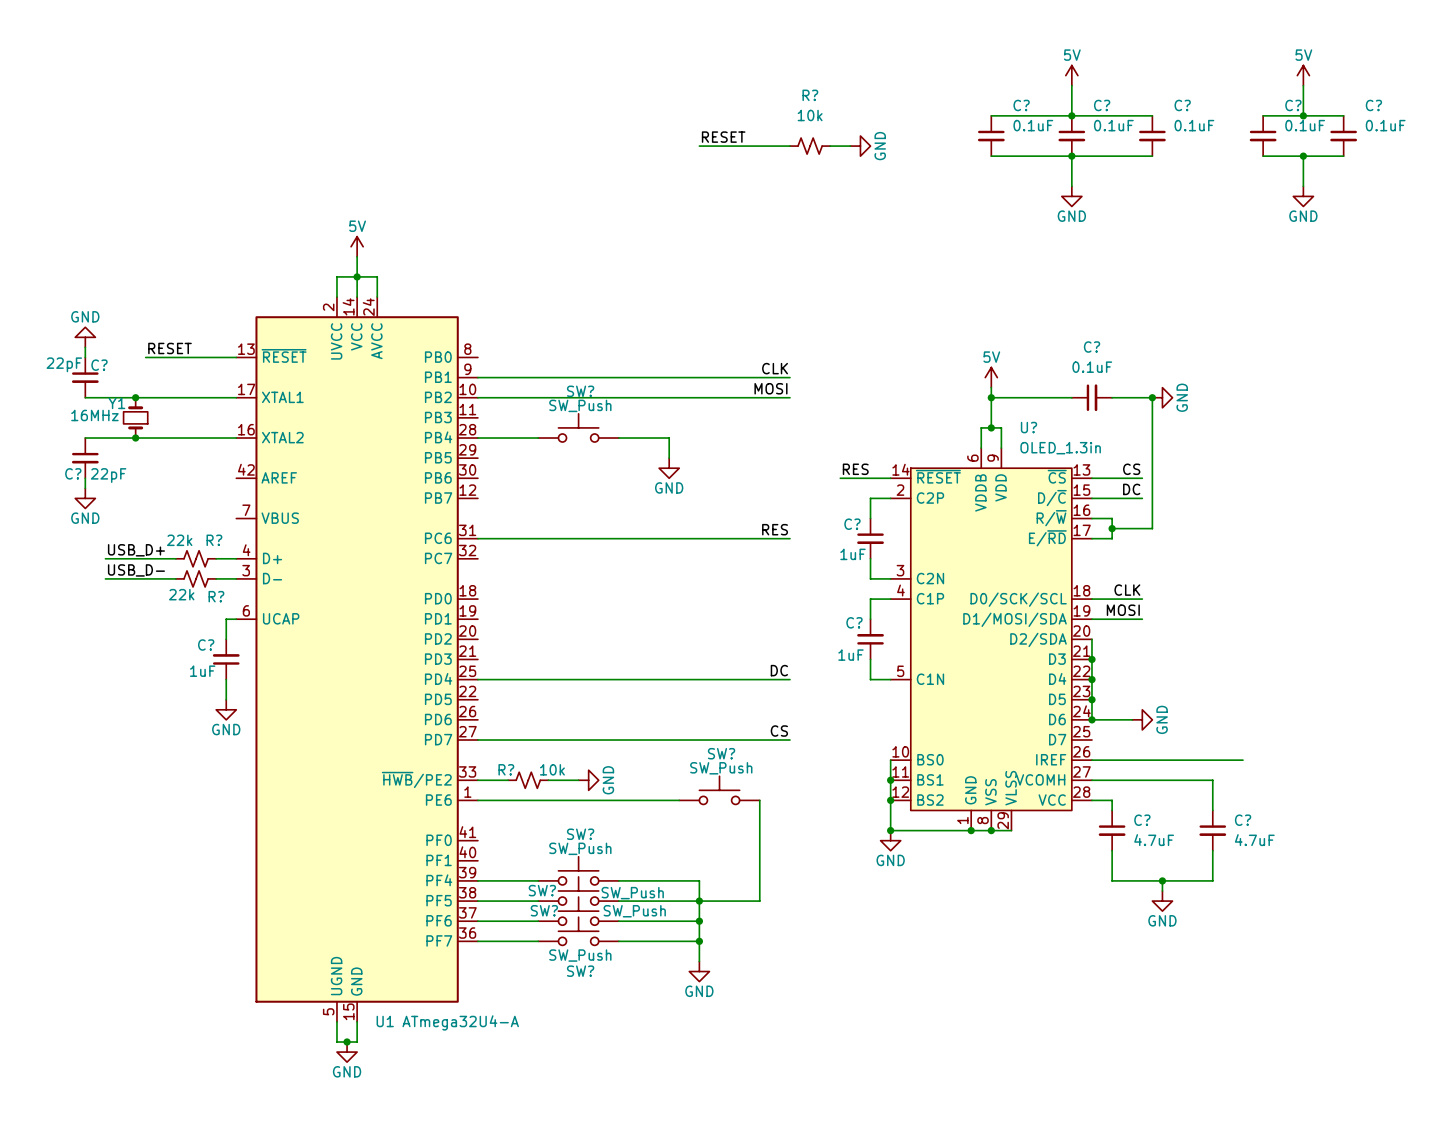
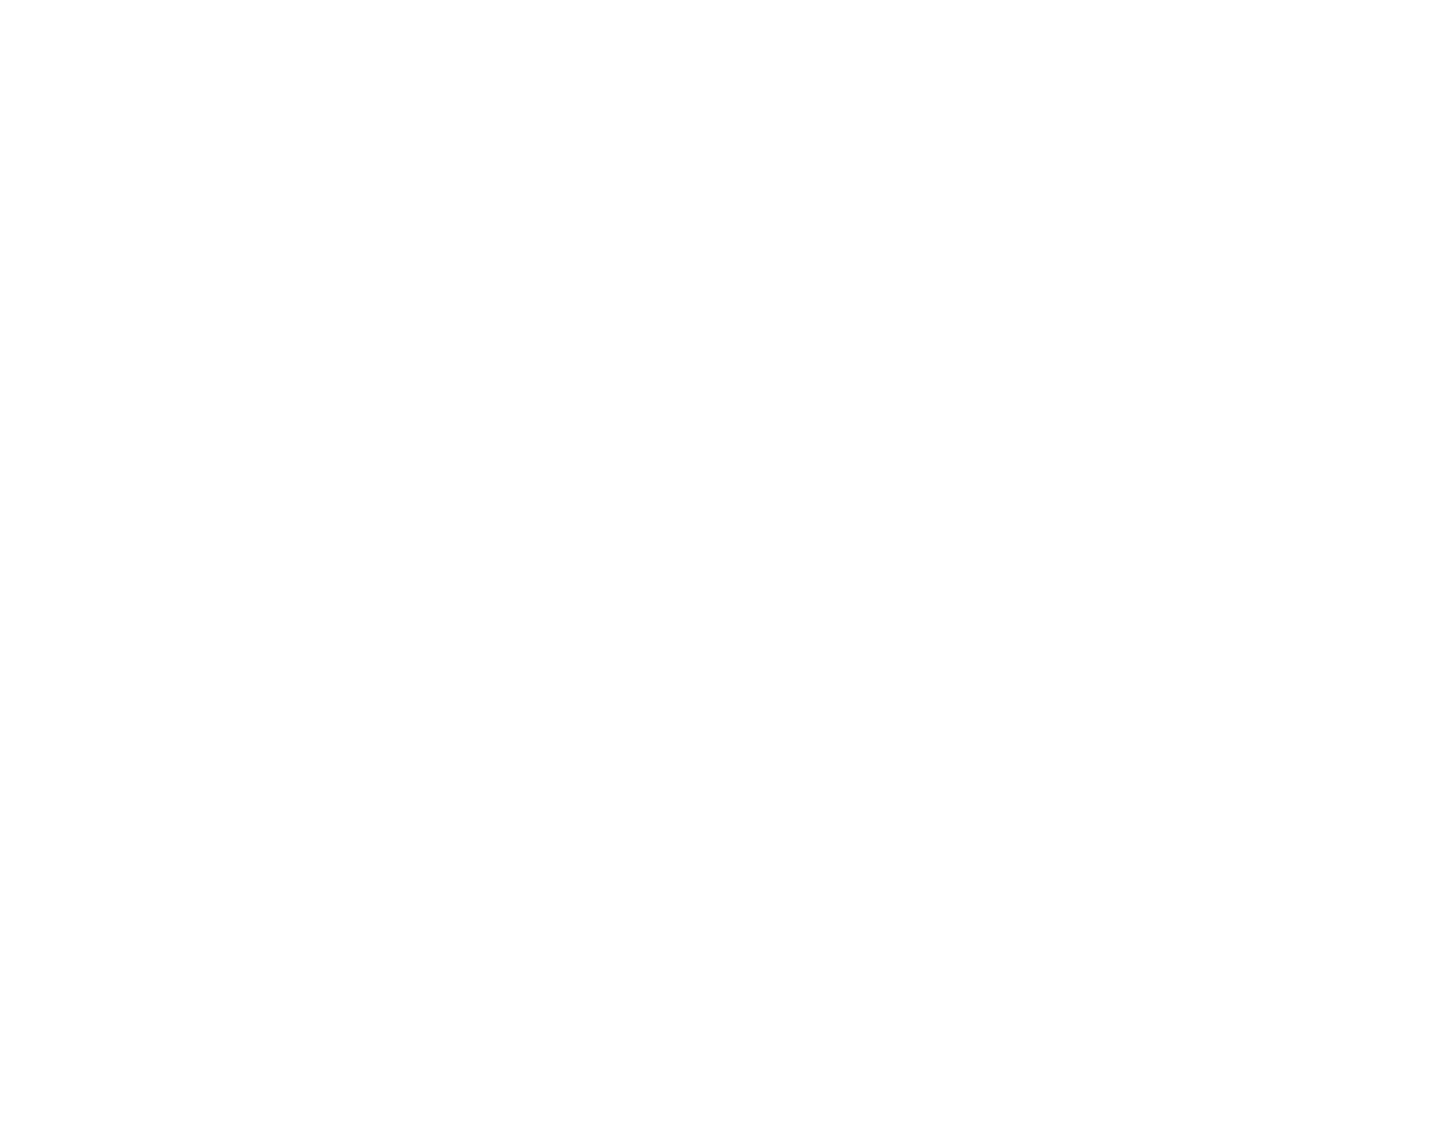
power symbol: 5V (1071, 75) -> none
power symbol: 5V (1303, 75) -> none
wire: (1071, 85) (1071, 115) -> none
wire: (1303, 85) (1303, 115) -> none
wire: (991, 115) (1152, 115) -> none
junction: (1071, 115) -> none
wire: (1263, 115) (1343, 115) -> none
junction: (1303, 115) -> none
C?: 0.1uF (991, 136) -> none
C?: 0.1uF (1071, 136) -> none
C?: 0.1uF (1152, 136) -> none
C?: 0.1uF (1263, 136) -> none
C?: 0.1uF (1343, 136) -> none
label: RESET (723, 137) -> none
wire: (699, 146) (789, 146) -> none
R?: 10k (810, 146) -> none
wire: (830, 146) (850, 146) -> none
power symbol: GND (860, 146) -> none
wire: (991, 156) (1152, 156) -> none
wire: (1071, 156) (1071, 186) -> none
junction: (1071, 156) -> none
wire: (1263, 156) (1343, 156) -> none
wire: (1303, 156) (1303, 186) -> none
junction: (1303, 156) -> none
power symbol: GND (1071, 196) -> none
power symbol: GND (1303, 196) -> none
power symbol: 5V (357, 246) -> none
wire: (357, 256) (357, 297) -> none
junction: (357, 276) -> none
wire: (336, 297) (336, 276) (377, 276) (377, 297) -> none
power symbol: GND (85, 337) -> none
wire: (85, 347) (85, 357) -> none
label: RESET (170, 348) -> none
wire: (145, 357) (236, 357) -> none
label: CLK (775, 368) -> none
C?: 22pF (85, 377) -> none
wire: (477, 377) (789, 377) -> none
power symbol: 5V (991, 377) -> none
wire: (991, 387) (991, 427) -> none
label: MOSI (770, 388) -> none
wire: (85, 397) (236, 397) -> none
junction: (135, 397) -> none
wire: (477, 397) (789, 397) -> none
wire: (991, 397) (1071, 397) -> none
junction: (991, 397) -> none
C?: 0.1uF (1091, 397) -> none
wire: (1112, 397) (1152, 397) (1152, 528) (1112, 528) -> none
junction: (1152, 397) -> none
power symbol: GND (1162, 397) -> none
Y1: 16MHz (135, 417) -> none
SW?: SW_Push (578, 427) -> none
junction: (991, 427) -> none
wire: (85, 438) (236, 438) -> none
junction: (135, 438) -> none
wire: (477, 438) (538, 438) -> none
wire: (618, 438) (669, 438) (669, 458) -> none
wire: (981, 448) (981, 427) (1001, 427) (1001, 448) -> none
C?: 22pF (85, 458) -> none
power symbol: GND (669, 468) -> none
label: RES (855, 469) -> none
label: CS (1131, 469) -> none
wire: (85, 478) (85, 488) -> none
wire: (840, 478) (890, 478) -> none
wire: (1091, 478) (1142, 478) -> none
label: DC (1131, 489) -> none
power symbol: GND (85, 498) -> none
wire: (890, 498) (870, 498) (870, 518) -> none
wire: (1091, 498) (1142, 498) -> none
wire: (1091, 518) (1112, 518) (1112, 538) (1091, 538) -> none
junction: (1112, 528) -> none
label: RES (775, 529) -> none
wire: (477, 538) (789, 538) -> none
C?: 1uF (870, 538) -> none
label: USB_D+ (136, 550) -> none
wire: (105, 558) (175, 558) -> none
R?: 22k (196, 558) -> none
wire: (216, 558) (236, 558) -> none
wire: (870, 558) (870, 578) (890, 578) -> none
label: USB_D- (136, 570) -> none
wire: (105, 578) (175, 578) -> none
R?: 22k (196, 578) -> none
wire: (216, 578) (236, 578) -> none
label: CLK (1127, 590) -> none
wire: (890, 599) (870, 599) (870, 619) -> none
wire: (1091, 599) (1142, 599) -> none
label: MOSI (1123, 610) -> none
wire: (236, 619) (226, 619) (226, 639) -> none
wire: (1091, 619) (1142, 619) -> none
C?: 1uF (870, 639) -> none
U?: OLED_1.3in (991, 639) -> none
wire: (1091, 639) (1091, 719) (1132, 719) -> none
C?: 1uF (226, 659) -> none
U1: ATmega32U4-A (357, 659) -> none
wire: (870, 659) (870, 679) (890, 679) -> none
junction: (1091, 659) -> none
label: DC (779, 670) -> none
wire: (226, 679) (226, 699) -> none
wire: (477, 679) (789, 679) -> none
junction: (1091, 679) -> none
junction: (1091, 699) -> none
power symbol: GND (226, 709) -> none
junction: (1091, 719) -> none
power symbol: GND (1142, 719) -> none
label: CS (779, 731) -> none
wire: (477, 740) (789, 740) -> none
wire: (890, 760) (890, 830) (1011, 830) -> none
wire: (1091, 760) (1242, 760) -> none
wire: (477, 780) (508, 780) -> none
R?: 10k (528, 780) -> none
wire: (548, 780) (578, 780) -> none
power symbol: GND (588, 780) -> none
junction: (890, 780) -> none
wire: (1091, 780) (1212, 780) (1212, 810) -> none
SW?: SW_Push (719, 790) -> none
wire: (477, 800) (679, 800) -> none
wire: (759, 800) (759, 901) (618, 901) -> none
junction: (890, 800) -> none
wire: (1091, 800) (1112, 800) (1112, 810) -> none
junction: (890, 830) -> none
junction: (971, 830) -> none
junction: (991, 830) -> none
C?: 4.7uF (1112, 830) -> none
C?: 4.7uF (1212, 830) -> none
power symbol: GND (890, 840) -> none
wire: (1112, 850) (1112, 880) (1212, 880) (1212, 850) -> none
SW?: SW_Push (578, 870) -> none
wire: (477, 880) (538, 880) -> none
wire: (618, 880) (699, 880) (699, 961) -> none
wire: (1162, 880) (1162, 891) -> none
junction: (1162, 880) -> none
SW?: SW_Push (578, 891) -> none
wire: (477, 901) (538, 901) -> none
junction: (699, 901) -> none
power symbol: GND (1162, 901) -> none
SW?: SW_Push (578, 911) -> none
wire: (477, 921) (538, 921) -> none
wire: (618, 921) (699, 921) -> none
junction: (699, 921) -> none
SW?: SW_Push (578, 931) -> none
wire: (477, 941) (538, 941) -> none
wire: (618, 941) (699, 941) -> none
junction: (699, 941) -> none
power symbol: GND (699, 971) -> none
wire: (336, 1021) (336, 1042) (357, 1042) (357, 1021) -> none
junction: (347, 1042) -> none
power symbol: GND (347, 1052) -> none

